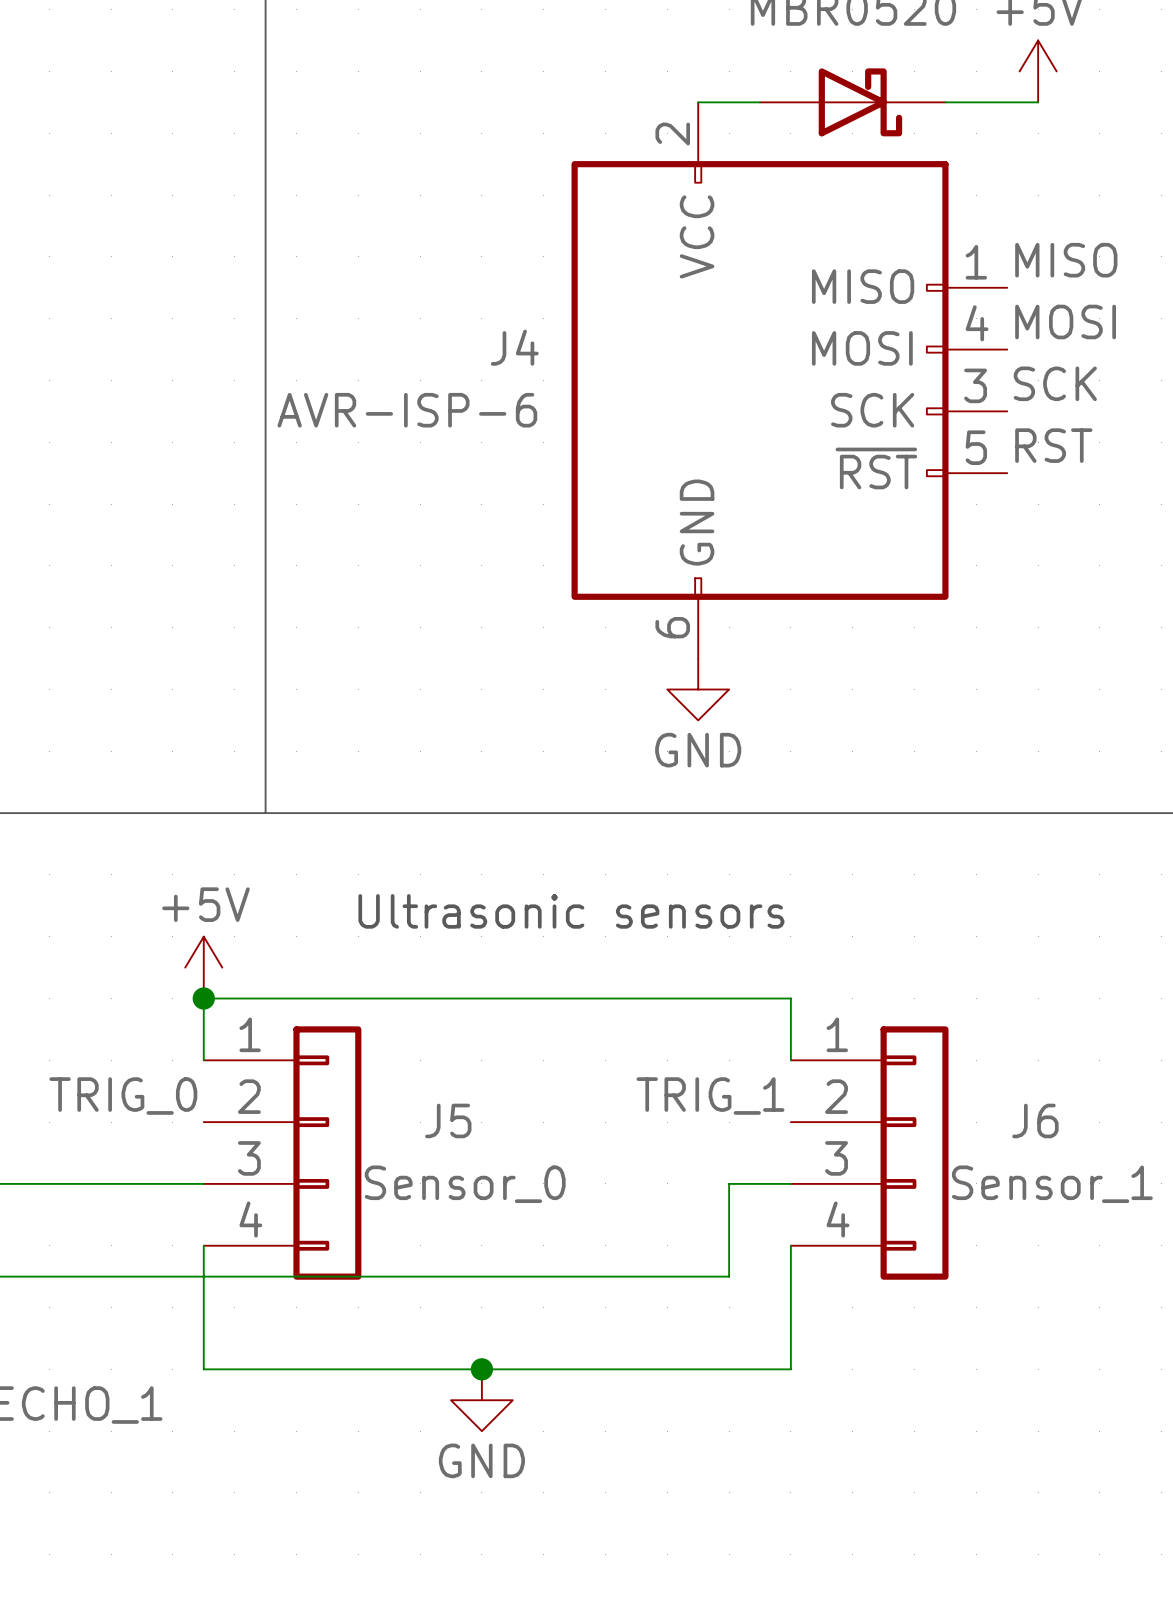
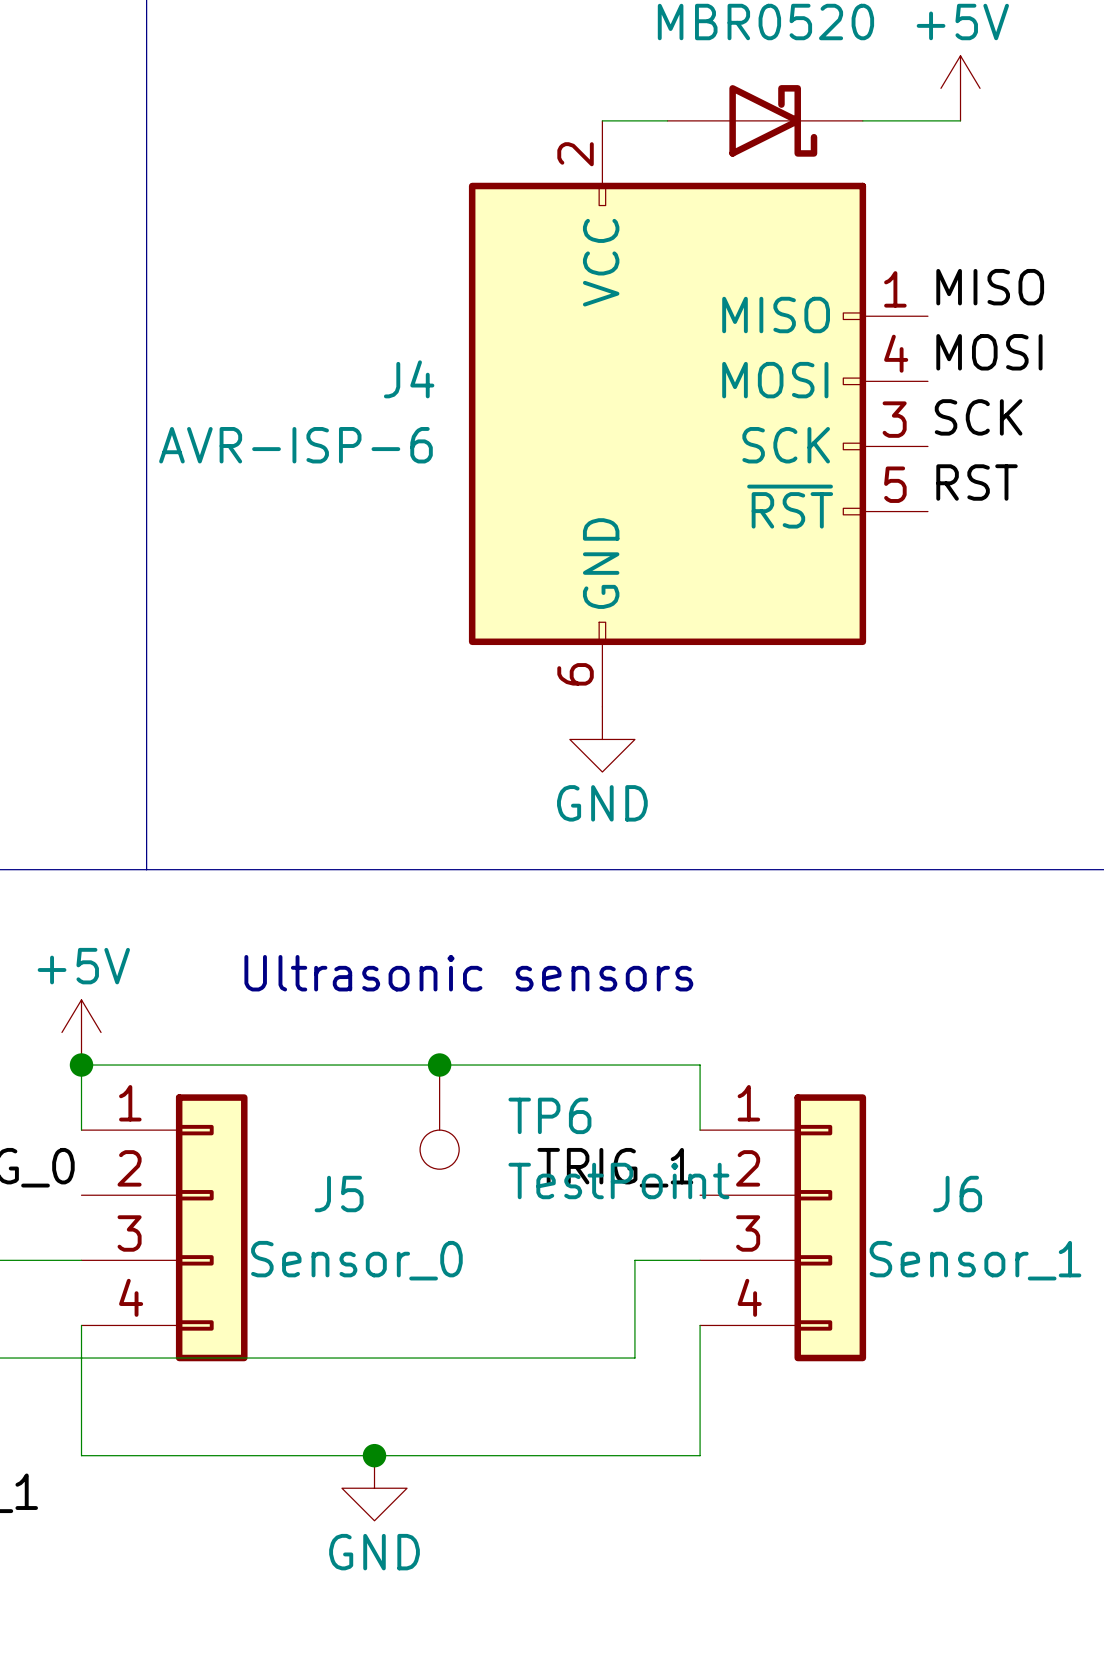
junction: none -> (439, 1065)
TP6: none -> TestPoint (439, 1117)

